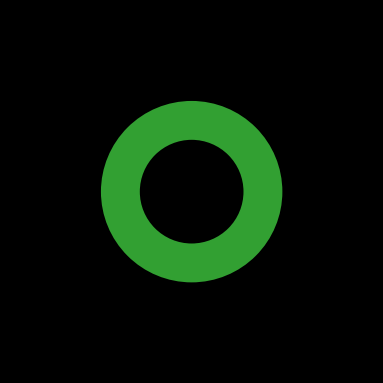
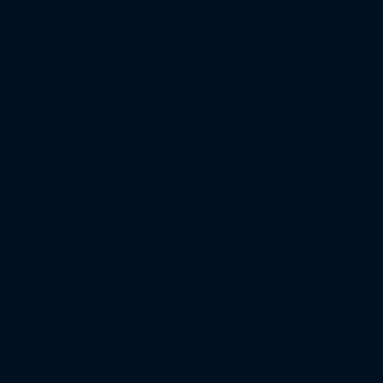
part: (191, 191) -> none

